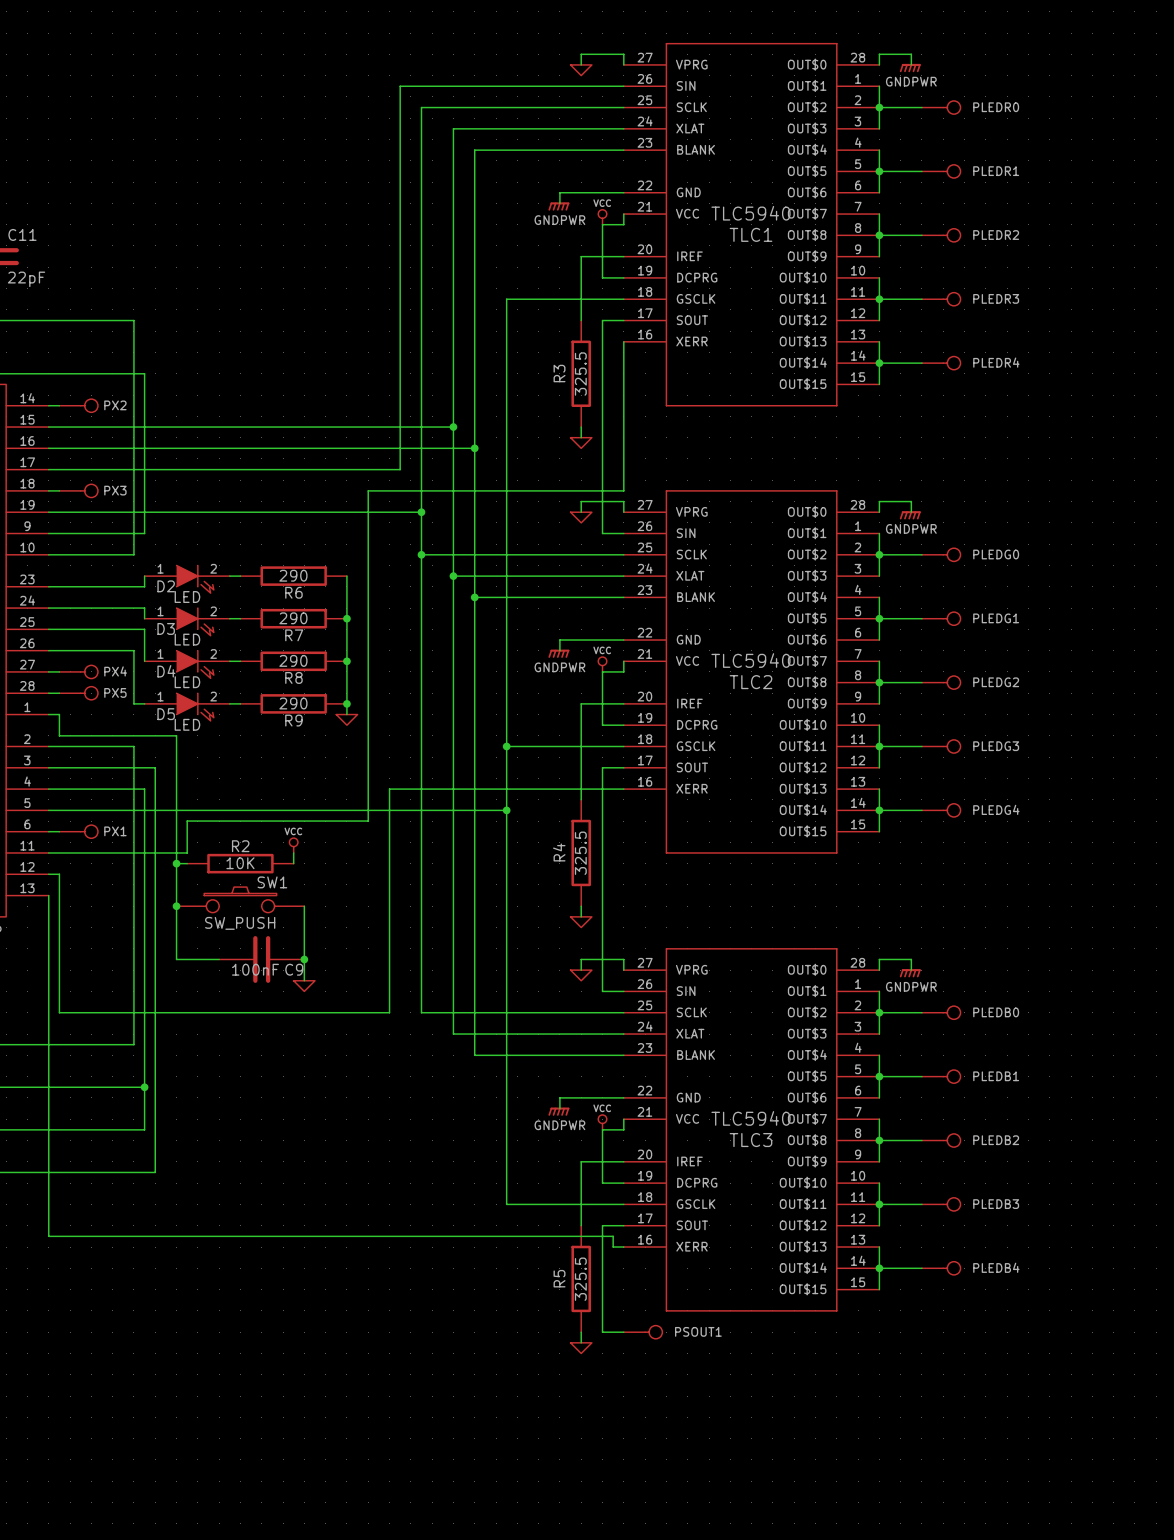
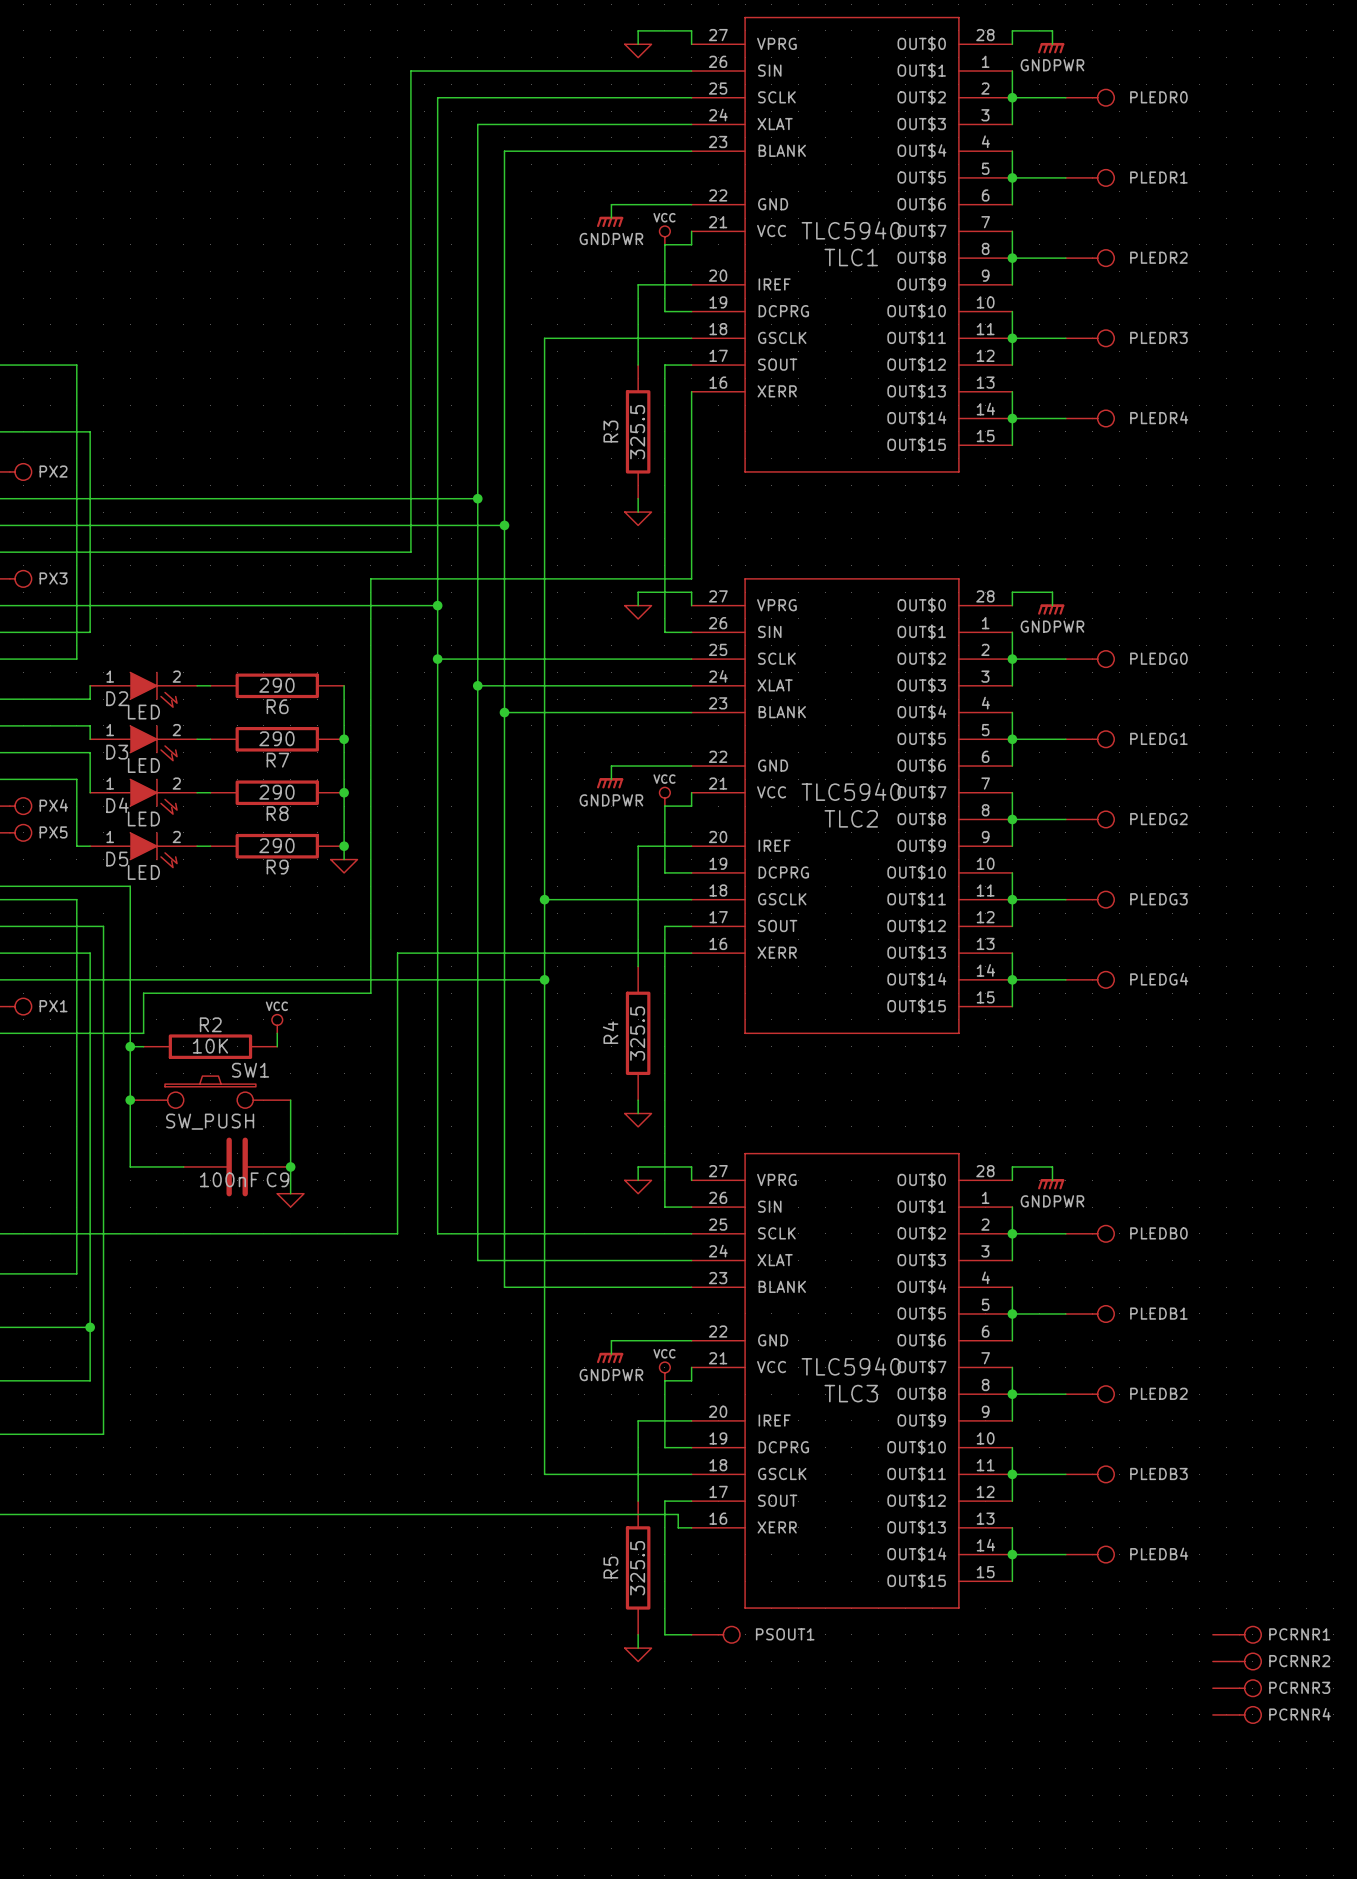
PCRNR1: none -> (1237, 1634)
PCRNR2: none -> (1237, 1661)
PCRNR3: none -> (1237, 1688)
PCRNR4: none -> (1237, 1714)

